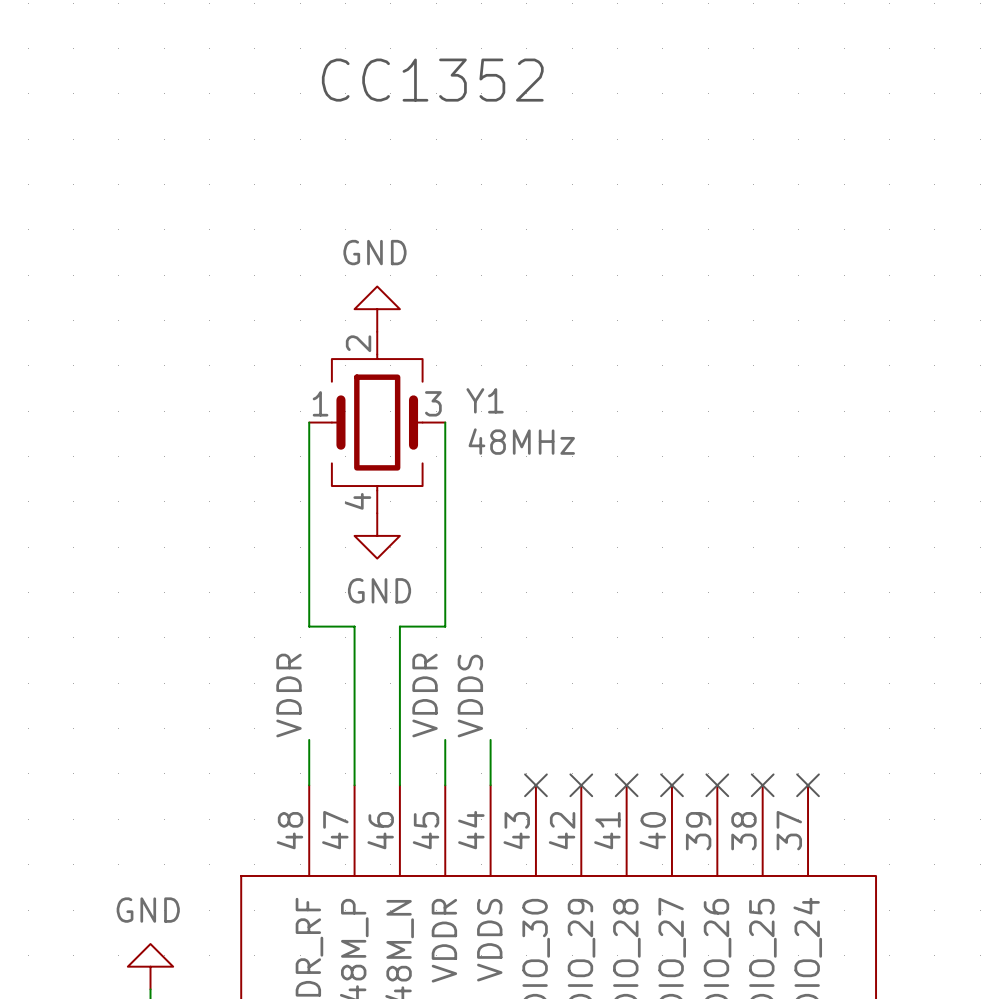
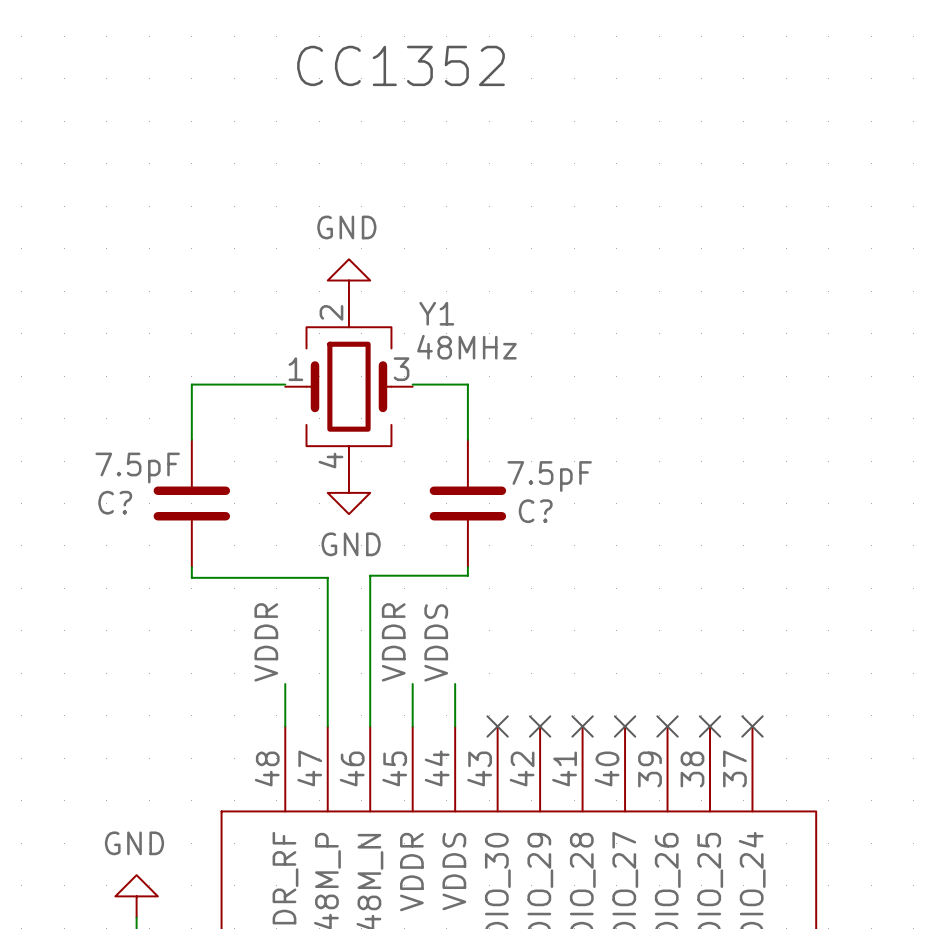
Y1 name position: Y1 (485, 400) -> Y1 (436, 313)
wire: none -> (285, 384) (191, 384) (191, 439)
wire: none -> (412, 384) (467, 384) (467, 439)
wire: (309, 422) (309, 626) -> (191, 567) (191, 577) (285, 577)
wire: (445, 422) (445, 626) (399, 626) -> (467, 567) (467, 575) (370, 575) (370, 577)
Y1 value position: 48MHz (521, 441) -> 48MHz (466, 347)
C?: none -> 7.5pF (191, 503)
C?: none -> 7.5pF (467, 503)

